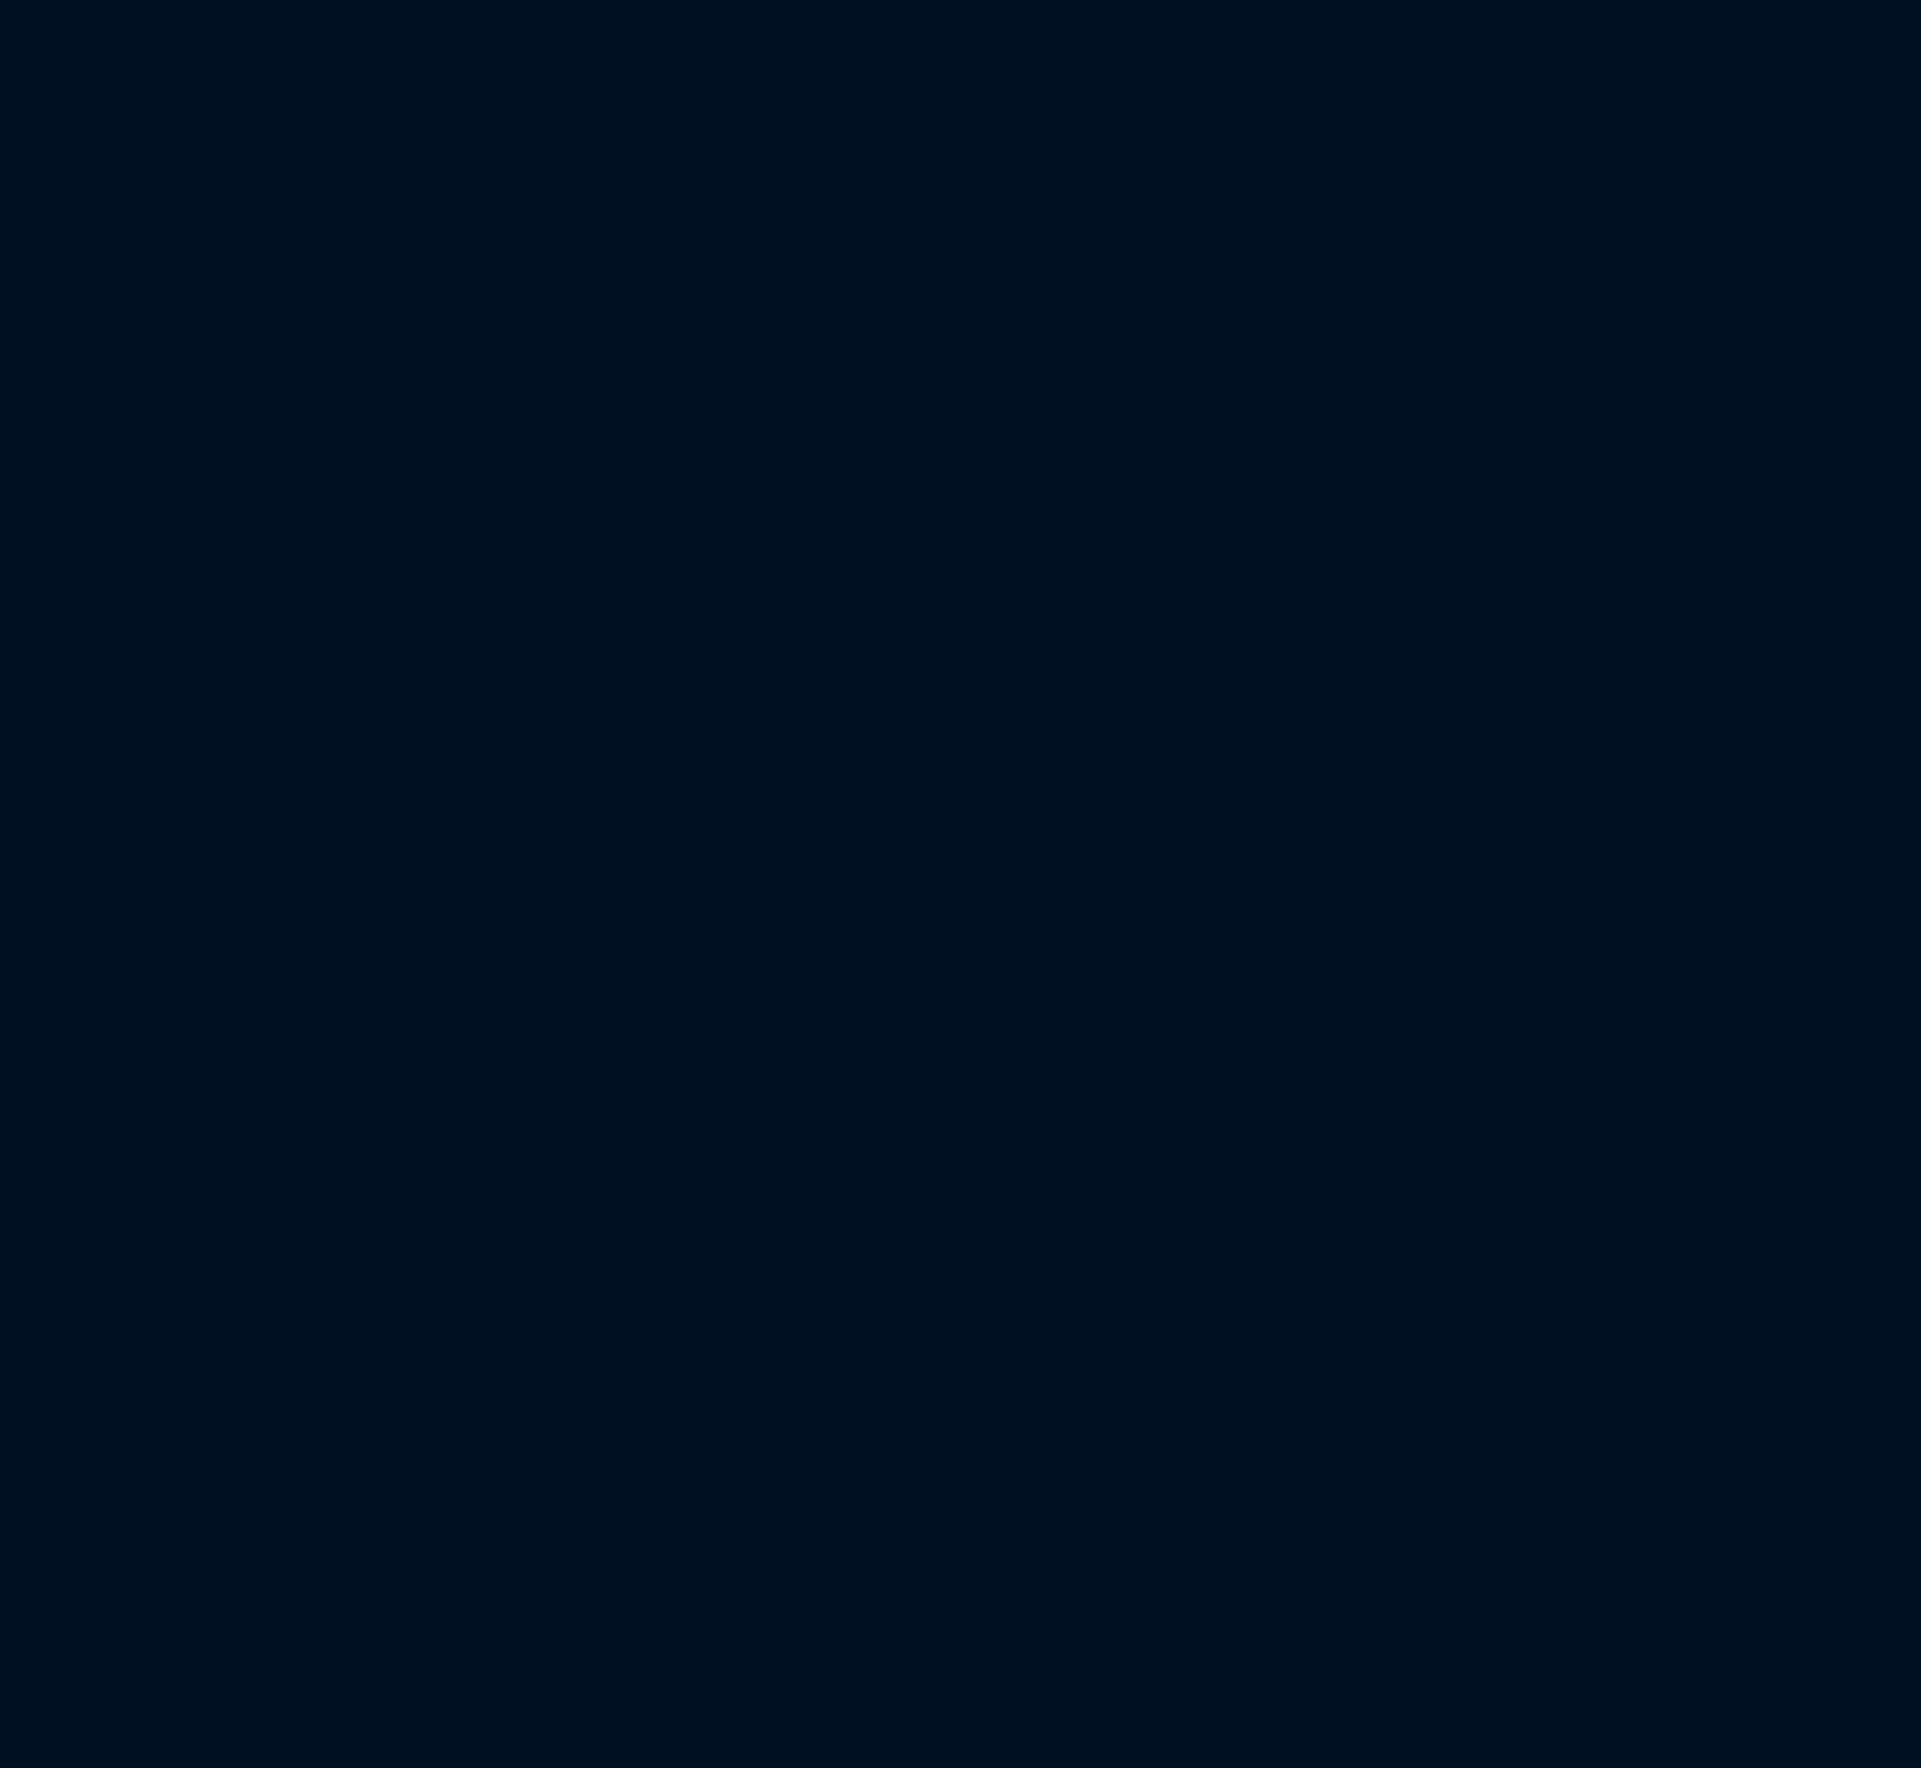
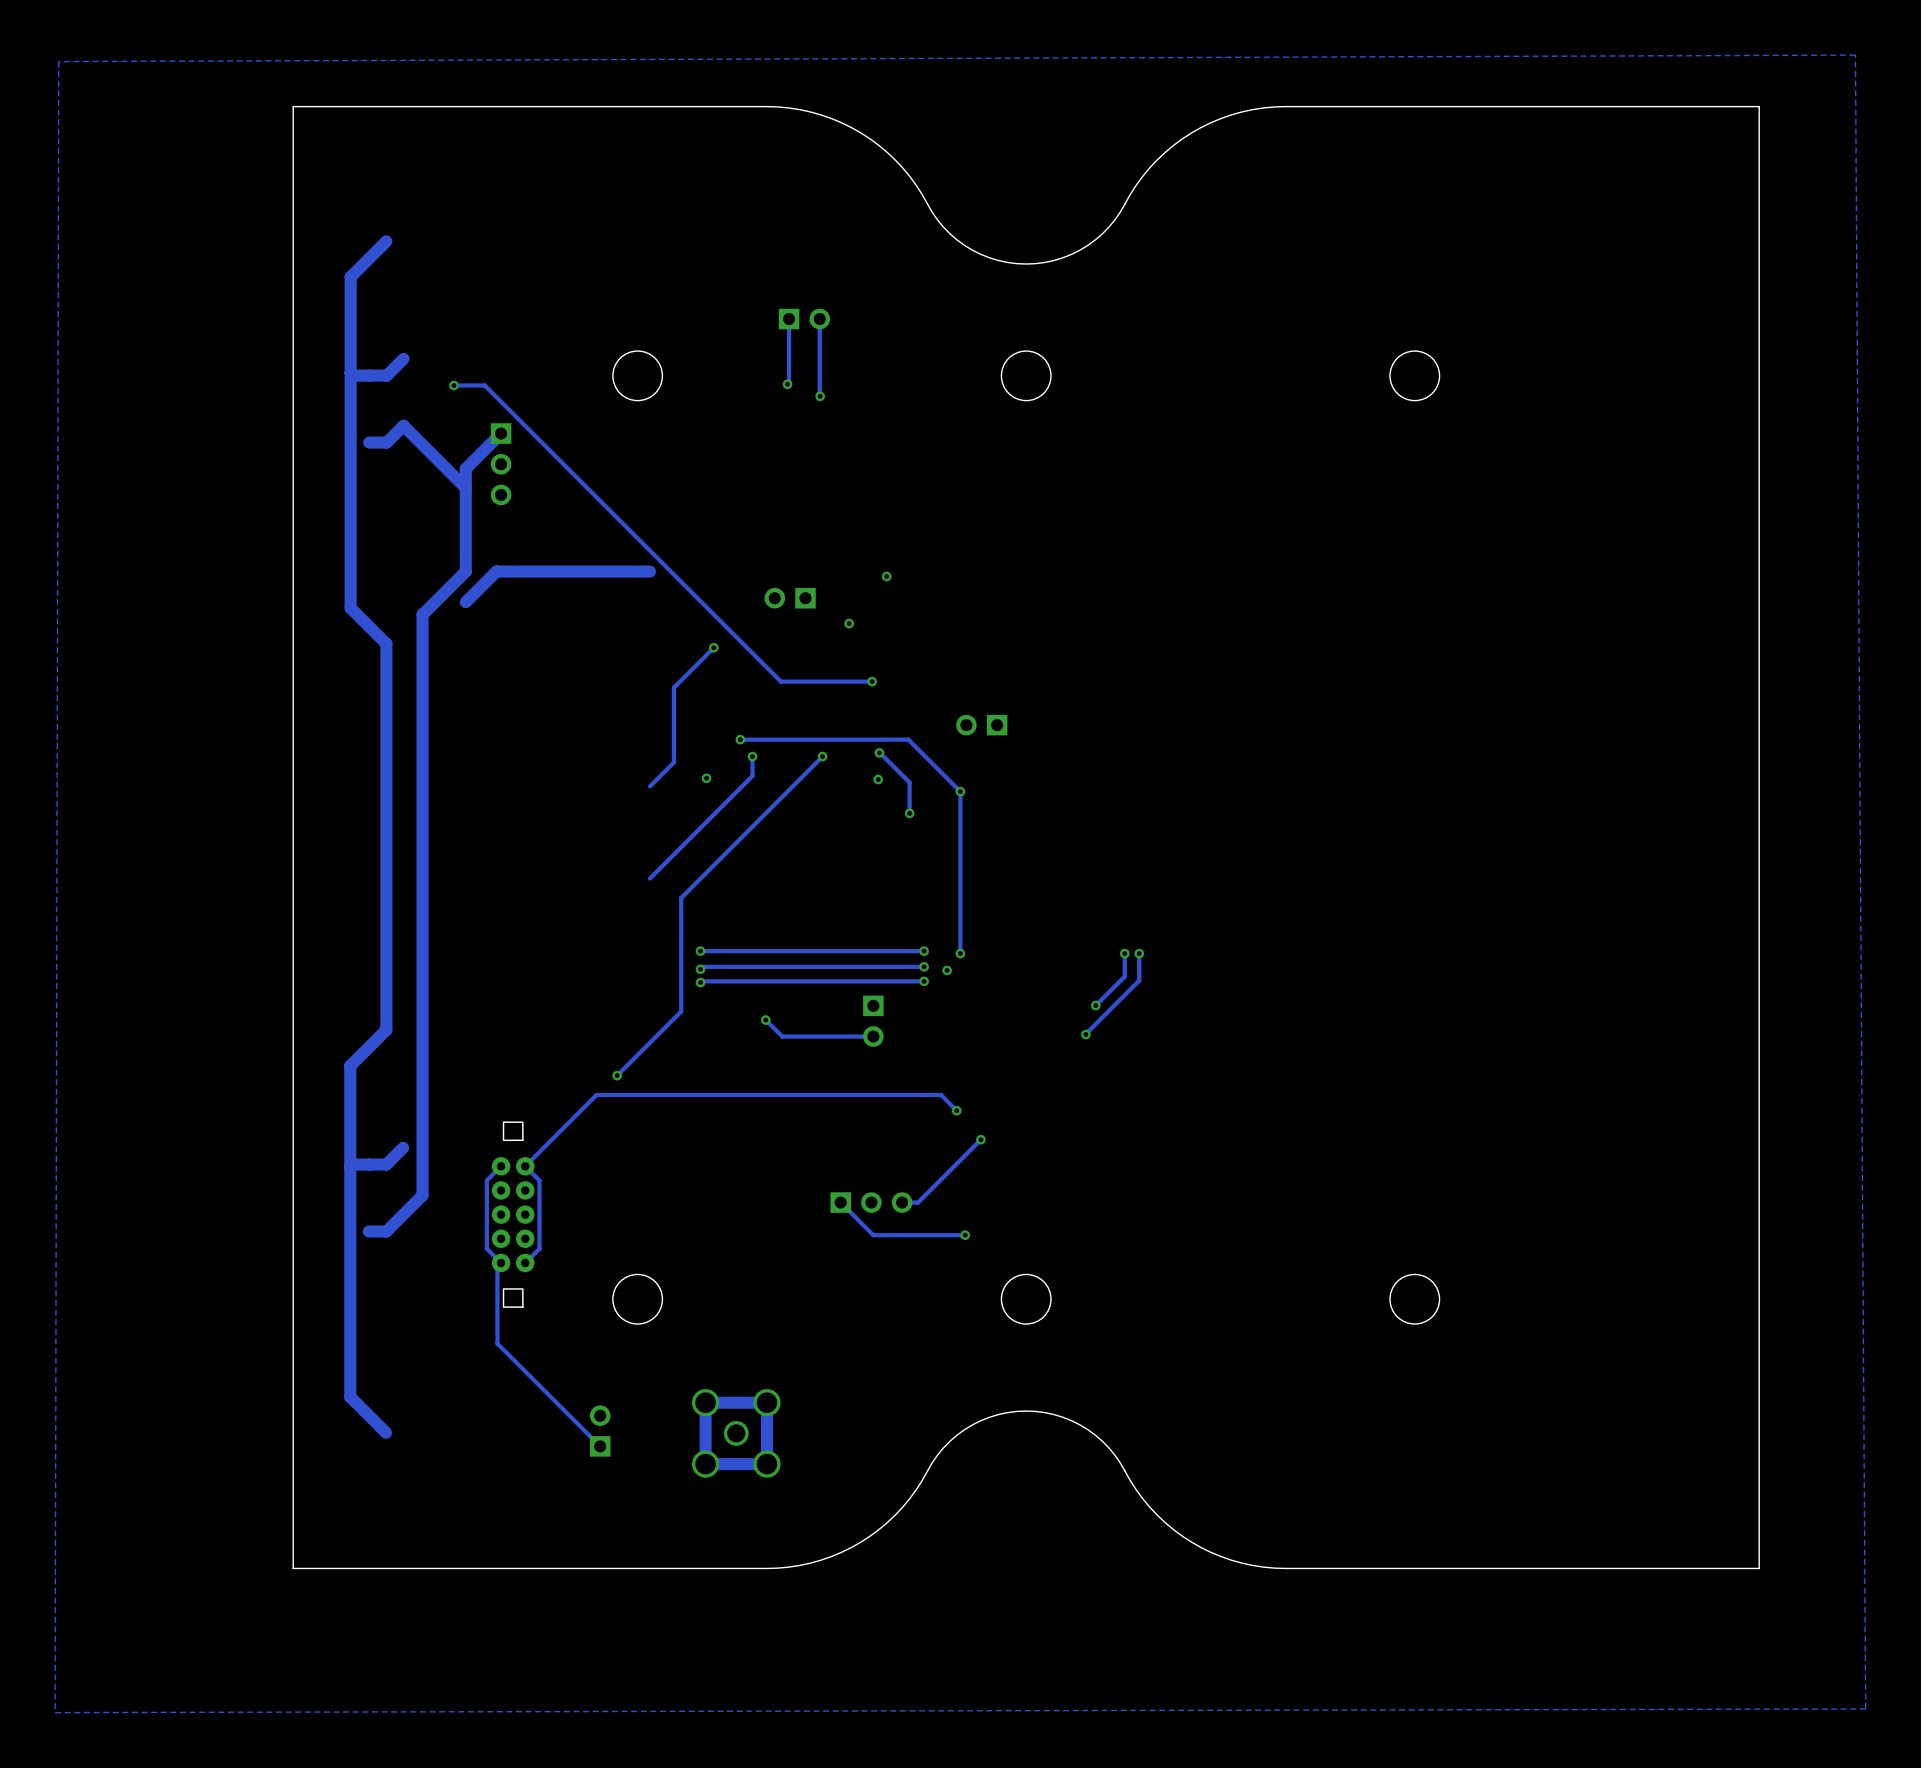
zone outline: none -> (1855, 55) (1865, 1708) (55, 1712) (58, 61) (1855, 55)
board edge: none -> (1759, 106) (1285, 106) (1252, 109) (1211, 122) (1173, 145) (1142, 176) (1108, 227) (1087, 245) (1062, 257) (1044, 262) (1026, 264) (998, 260) (980, 254) (964, 245) (943, 227) (909, 176) (878, 145) (841, 122) (799, 109) (766, 106) (293, 106) (293, 1568) (766, 1568) (799, 1565) (841, 1552) (878, 1529) (909, 1498) (943, 1447) (964, 1429) (980, 1420) (998, 1414) (1026, 1411) (1044, 1412) (1062, 1417) (1087, 1429) (1108, 1447) (1142, 1498) (1173, 1529) (1211, 1552) (1252, 1565) (1285, 1568) (1759, 1568) (1759, 106)
track: none -> (386, 241) (350, 277) (350, 608) (386, 643) (386, 1029) (350, 1066) (350, 1396) (386, 1432)
track: none -> (789, 319) (787, 384)
part: none -> (804, 319)
track: none -> (819, 319) (820, 396)
round board edge: none -> [612, 351, 663, 401]
round board edge: none -> [1001, 351, 1051, 401]
round board edge: none -> [1389, 351, 1440, 401]
track: none -> (403, 358) (386, 375) (353, 375) (350, 372)
via: none -> (787, 384)
track: none -> (453, 385) (484, 385) (780, 681) (872, 681)
via: none -> (453, 385)
via: none -> (820, 396)
track: none -> (501, 433) (465, 468) (465, 571) (422, 614) (422, 1195) (386, 1231) (368, 1231)
track: none -> (369, 442) (386, 442) (403, 425) (465, 488)
part: none -> (501, 464)
track: none -> (650, 571) (496, 571) (465, 602)
via: none -> (886, 576)
part: none -> (790, 598)
via: none -> (849, 623)
track: none -> (713, 647) (673, 687) (673, 762) (650, 786)
via: none -> (713, 647)
via: none -> (872, 681)
part: none -> (981, 725)
track: none -> (740, 739) (908, 739) (960, 791) (960, 953)
via: none -> (740, 739)
track: none -> (879, 752) (909, 782) (909, 813)
via: none -> (879, 752)
track: none -> (752, 756) (752, 776) (650, 878)
via: none -> (752, 756)
track: none -> (822, 756) (681, 897) (681, 1011) (617, 1075)
via: none -> (822, 756)
via: none -> (706, 778)
via: none -> (878, 779)
via: none -> (960, 791)
via: none -> (909, 813)
via: none -> (700, 951)
track: none -> (924, 951) (700, 951)
via: none -> (924, 951)
via: none -> (960, 953)
track: none -> (1124, 953) (1124, 976) (1095, 1005)
via: none -> (1124, 953)
track: none -> (1139, 953) (1139, 980) (1085, 1034)
via: none -> (1139, 953)
track: none -> (924, 966) (702, 966) (700, 969)
via: none -> (924, 966)
via: none -> (700, 969)
via: none -> (947, 970)
track: none -> (924, 981) (700, 982)
via: none -> (924, 981)
via: none -> (700, 982)
via: none -> (1095, 1005)
track: none -> (765, 1020) (782, 1036) (873, 1036)
via: none -> (765, 1020)
part: none -> (873, 1021)
via: none -> (1085, 1034)
via: none -> (617, 1075)
track: none -> (956, 1110) (941, 1094) (596, 1094) (525, 1166) (539, 1180) (539, 1248) (525, 1262)
via: none -> (956, 1110)
track: none -> (980, 1139) (918, 1202) (902, 1202)
via: none -> (980, 1139)
track: none -> (403, 1147) (386, 1164) (352, 1164) (350, 1167)
track: none -> (501, 1166) (486, 1180) (486, 1248) (501, 1262) (497, 1266) (497, 1343) (600, 1446)
track: none -> (840, 1202) (873, 1235) (965, 1235)
part: none -> (871, 1202)
part: none -> (513, 1214)
via: none -> (965, 1235)
round board edge: none -> [612, 1274, 663, 1325]
round board edge: none -> [1001, 1274, 1051, 1325]
round board edge: none -> [1389, 1274, 1440, 1325]
track: none -> (767, 1402) (767, 1464) (705, 1464) (705, 1402) (767, 1402)
part: none -> (600, 1431)
part: none -> (736, 1433)

